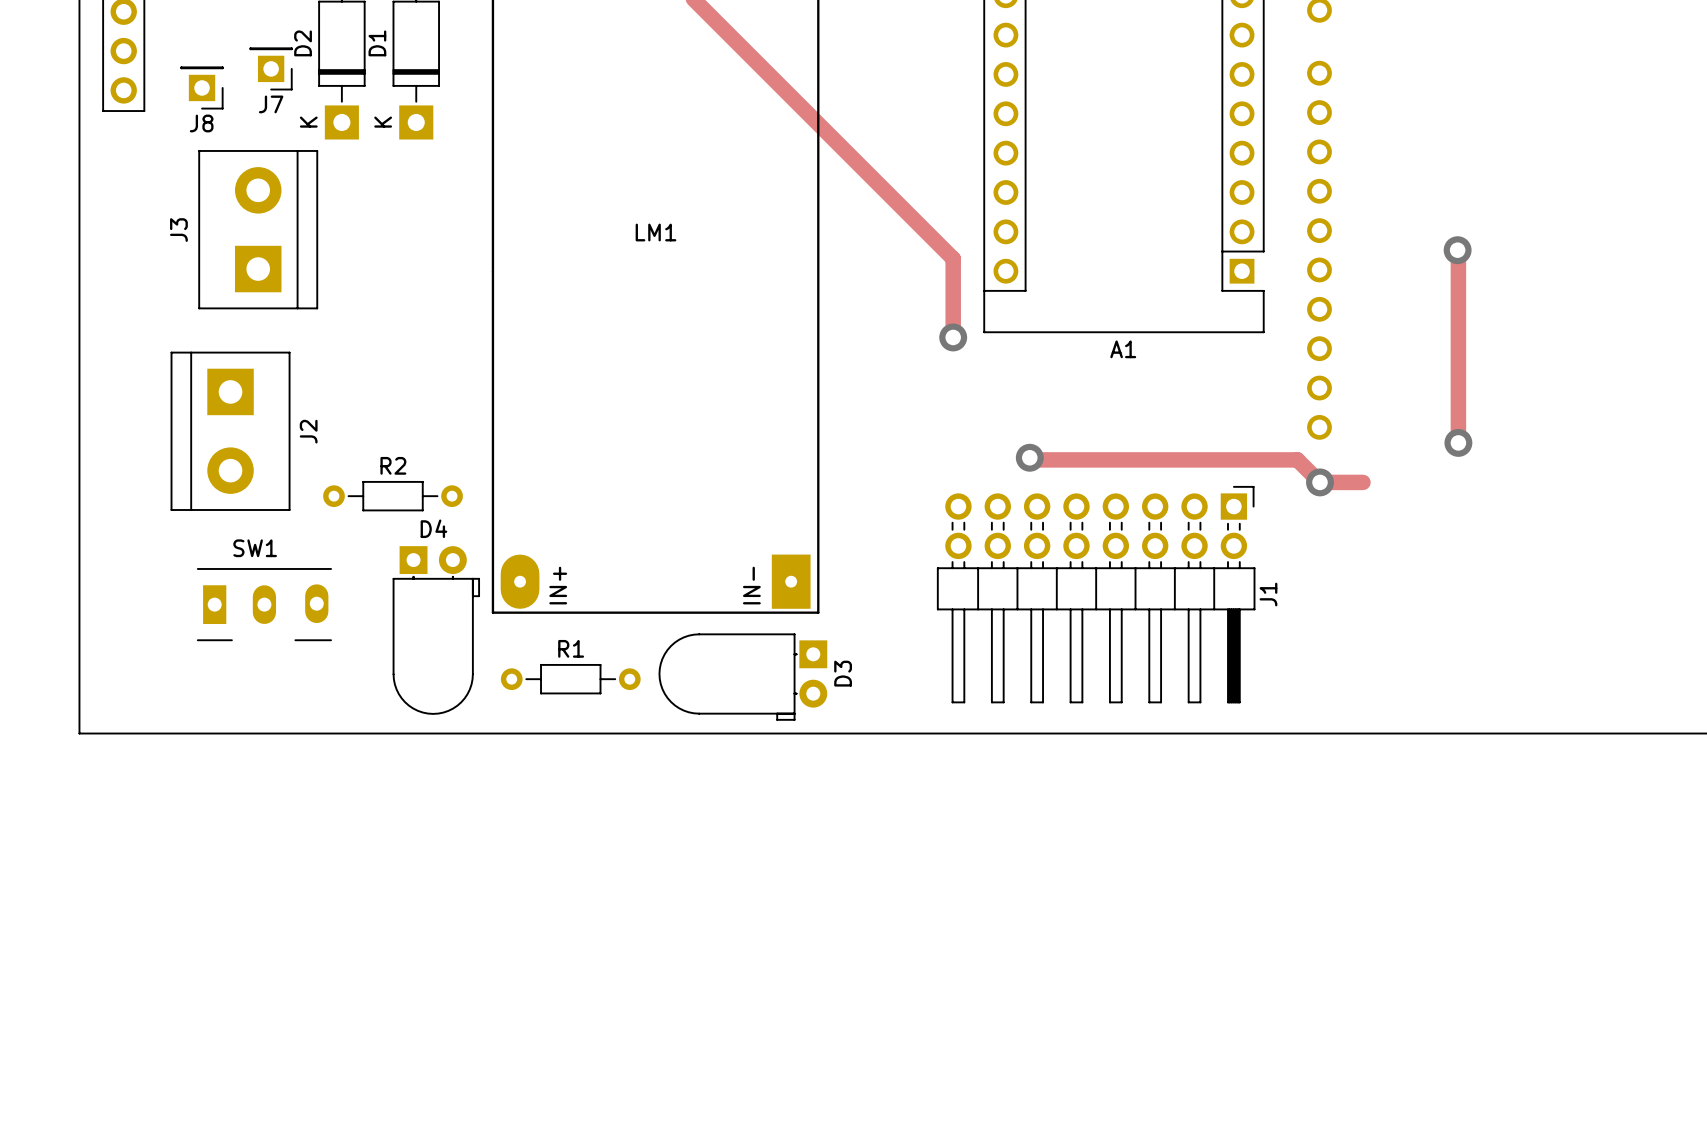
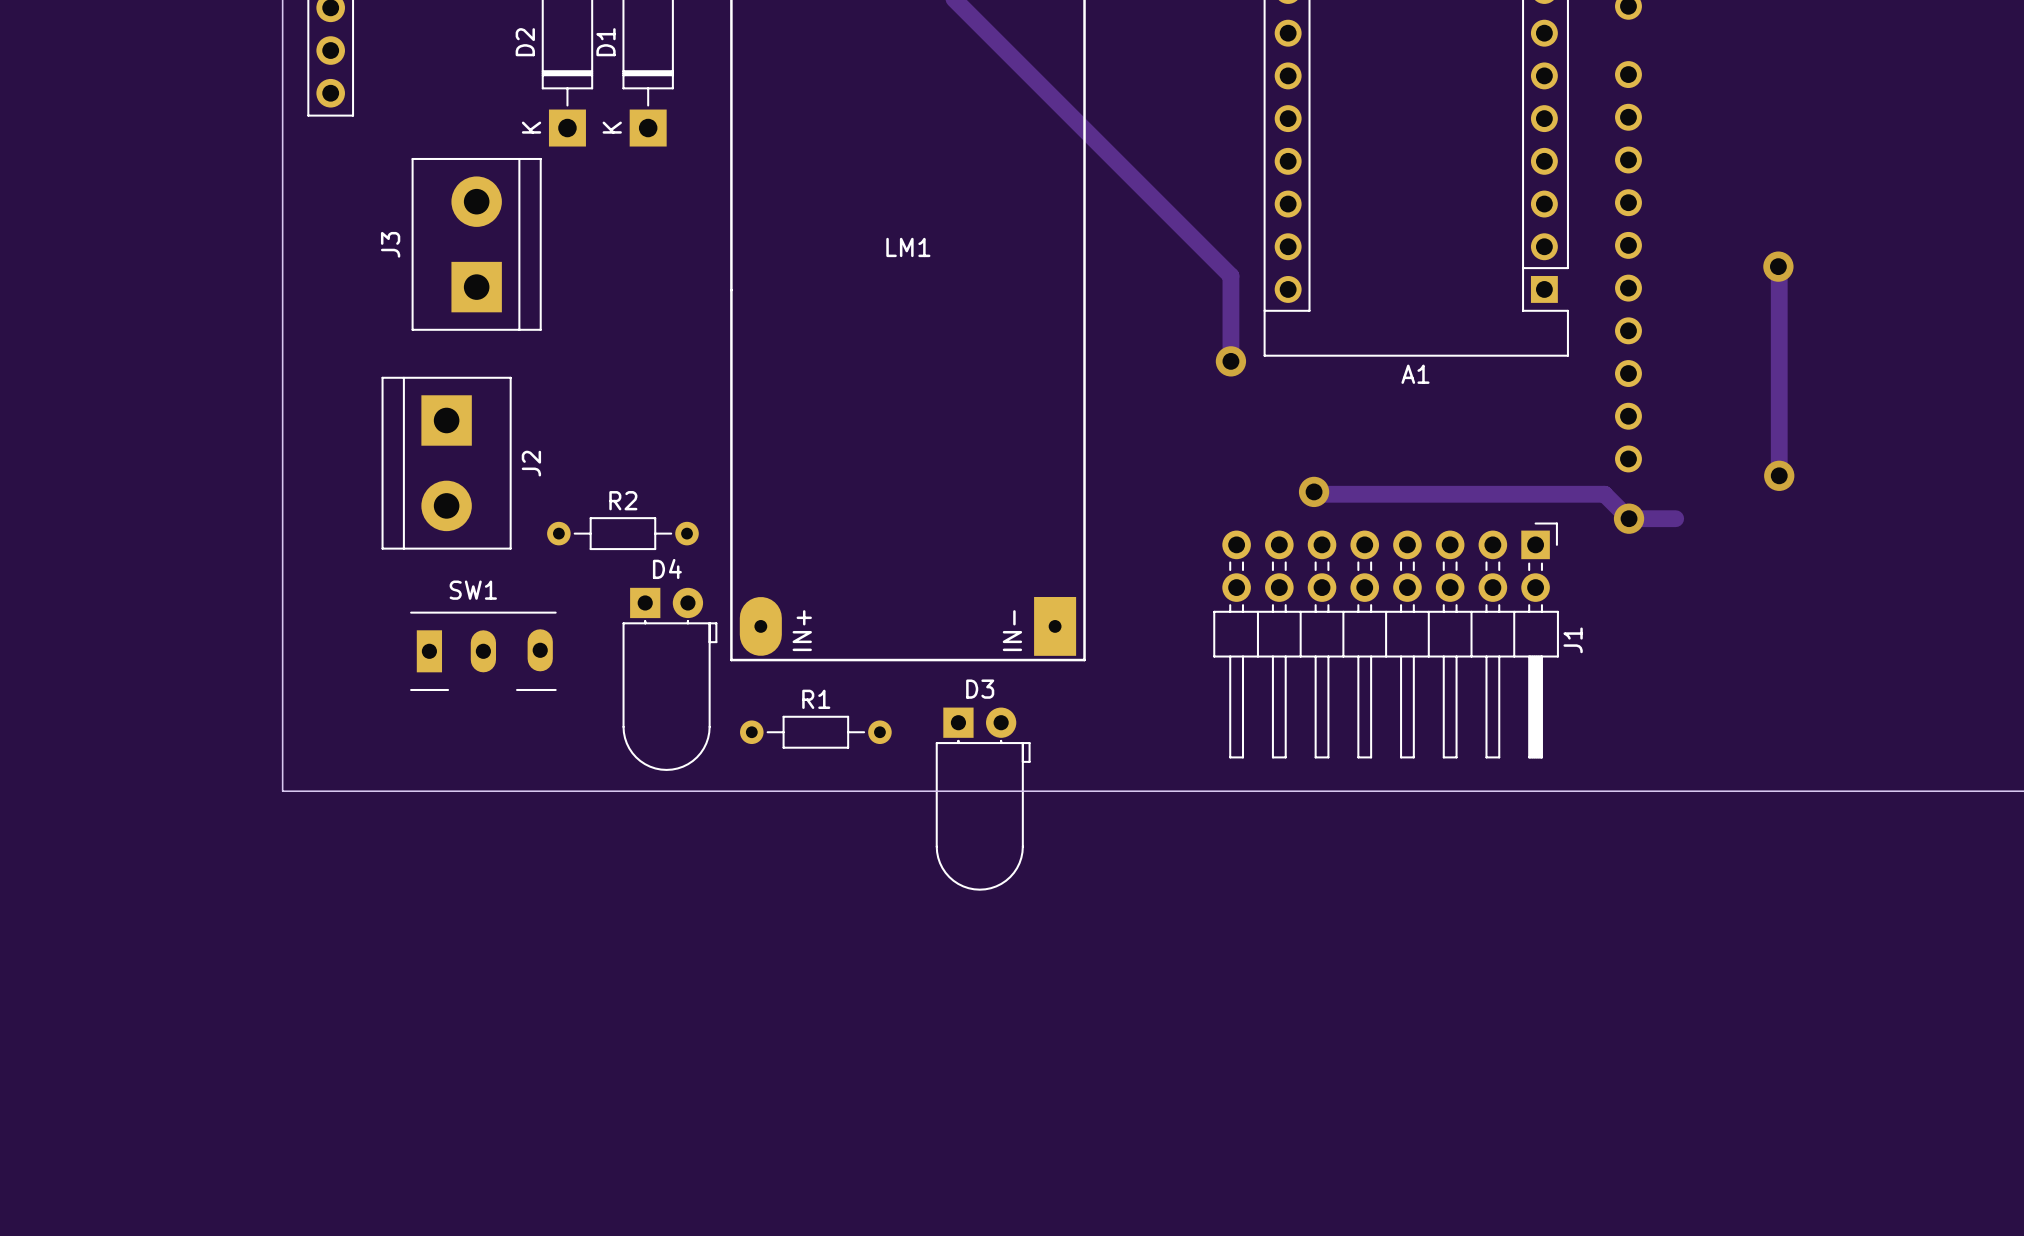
J7: (271, 68) -> none
J8: (202, 87) -> none
D3 rotation: 0° (742, 677) -> 90° counterclockwise (983, 799)

